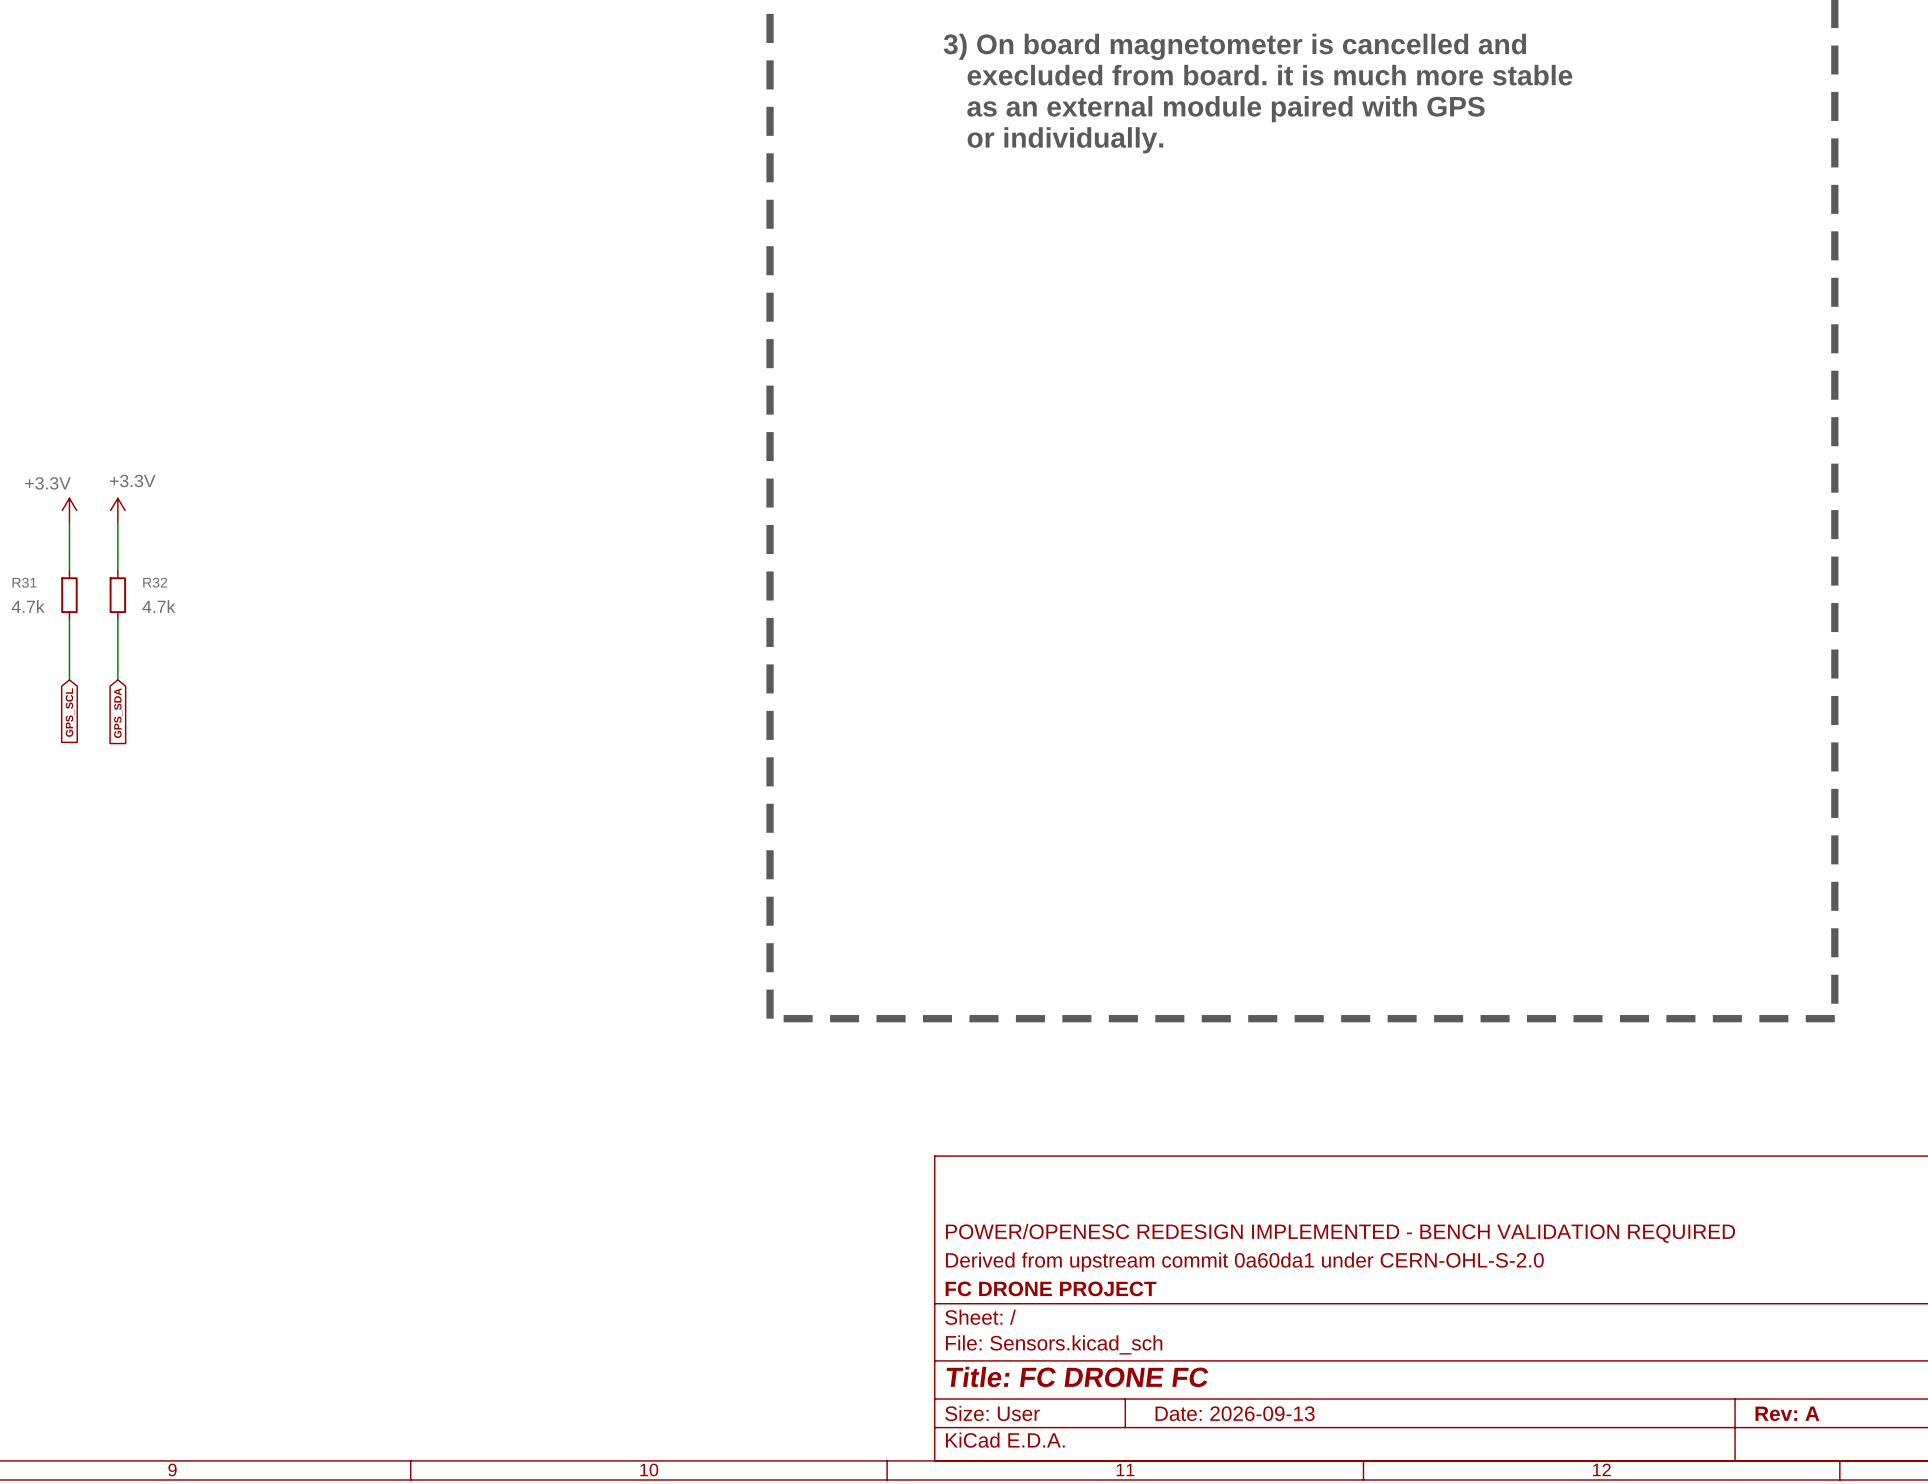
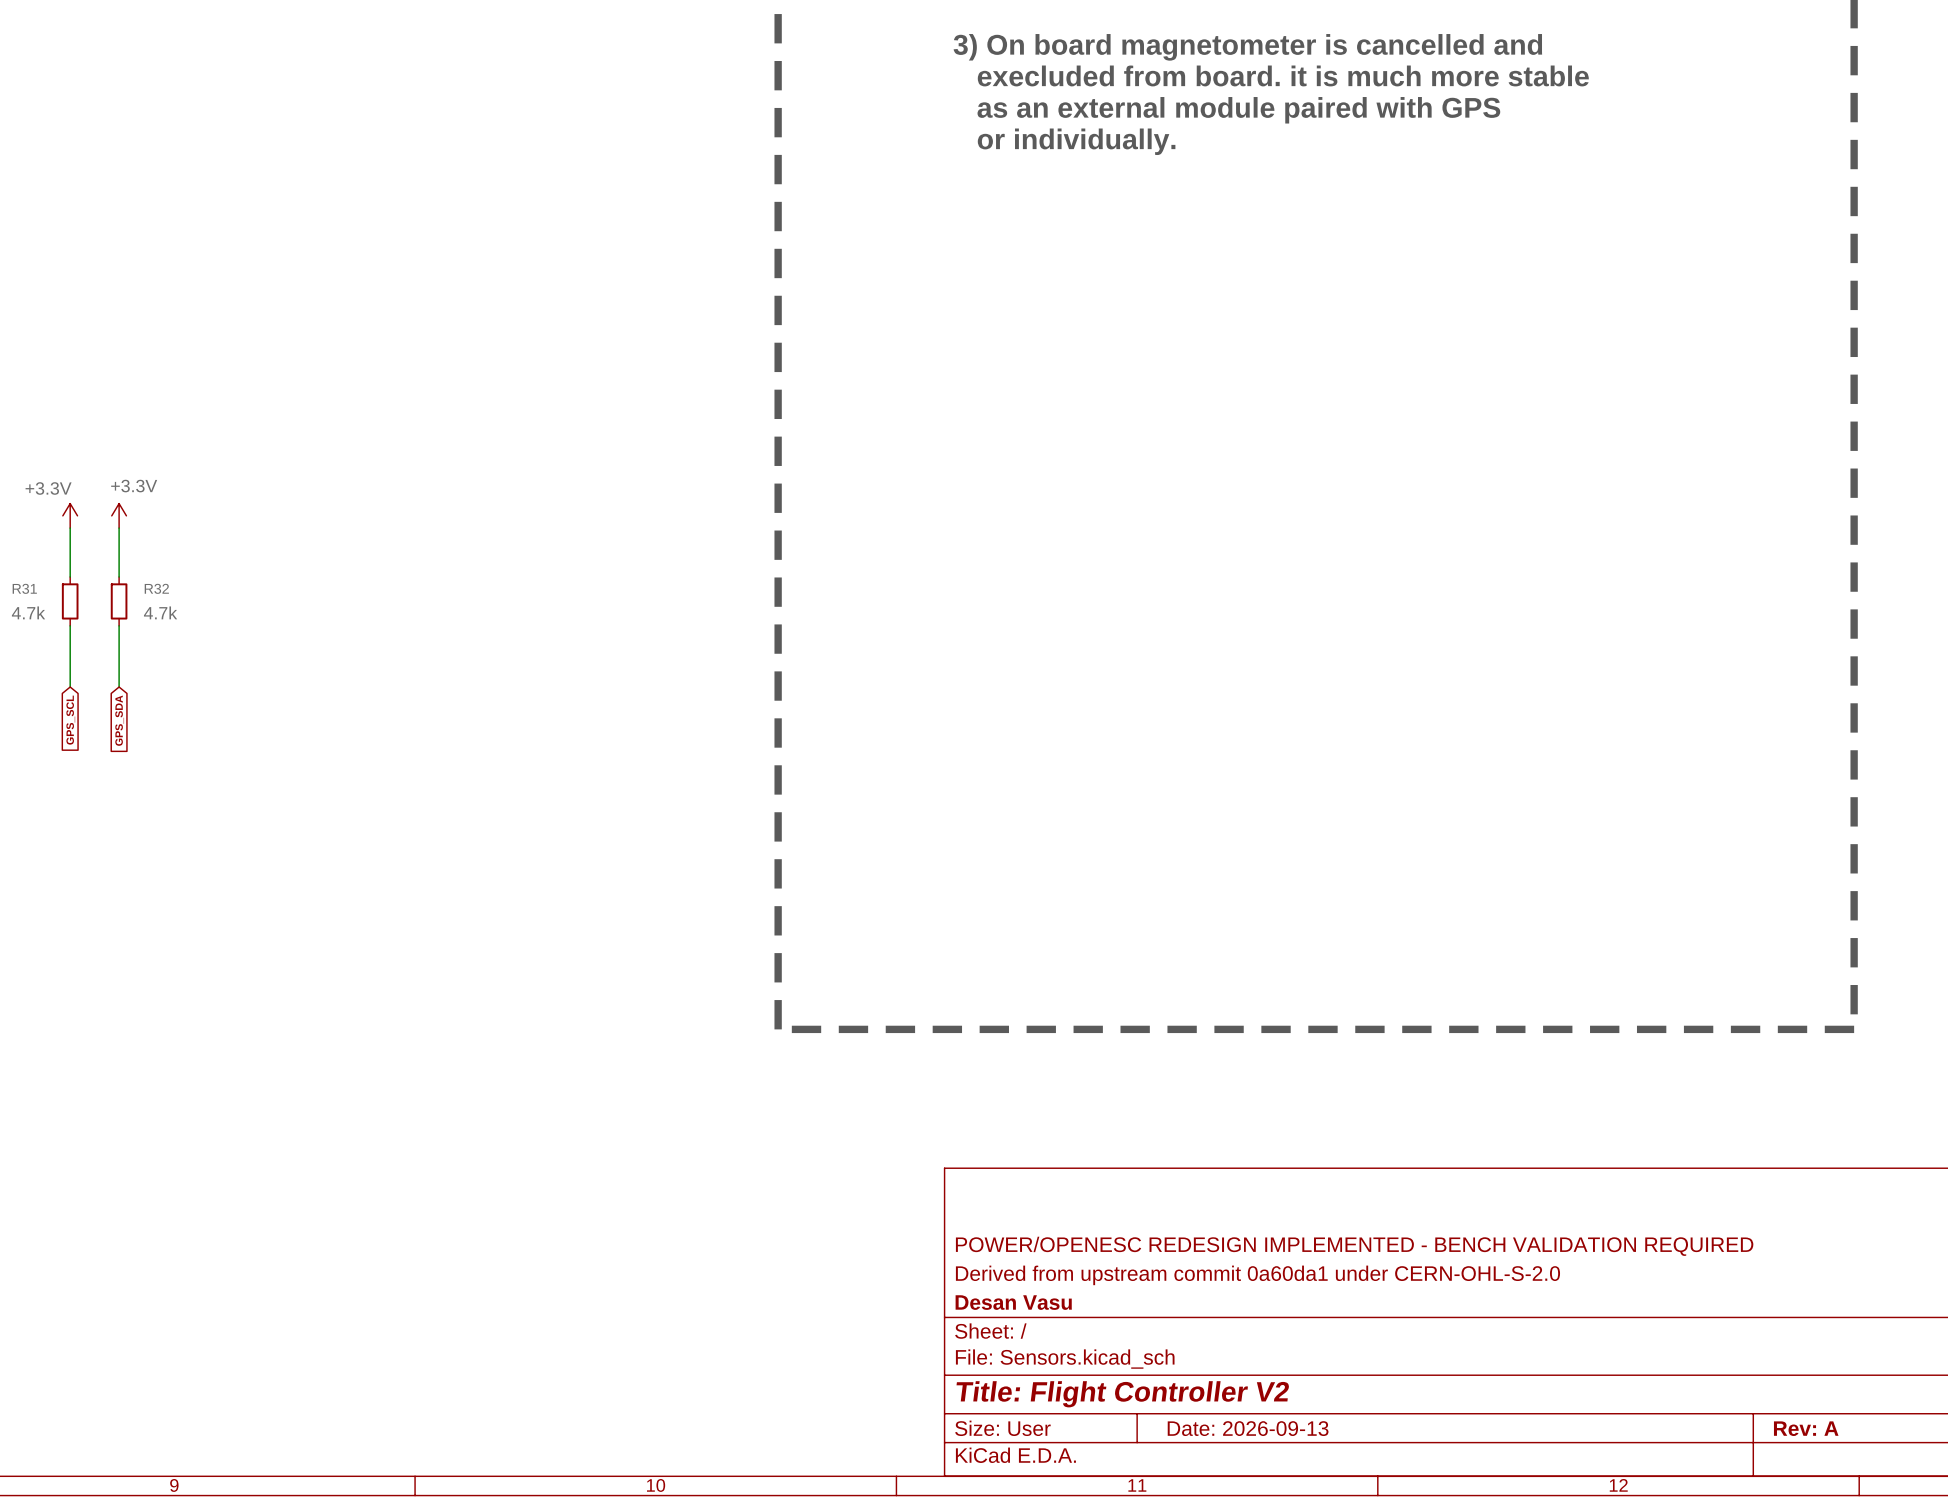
title block: FC DRONE PROJECT (1051, 1288) -> Desan Vasu (1013, 1302)
title block: Title: FC DRONE FC (1077, 1376) -> Title: Flight Controller V2 (1122, 1394)

